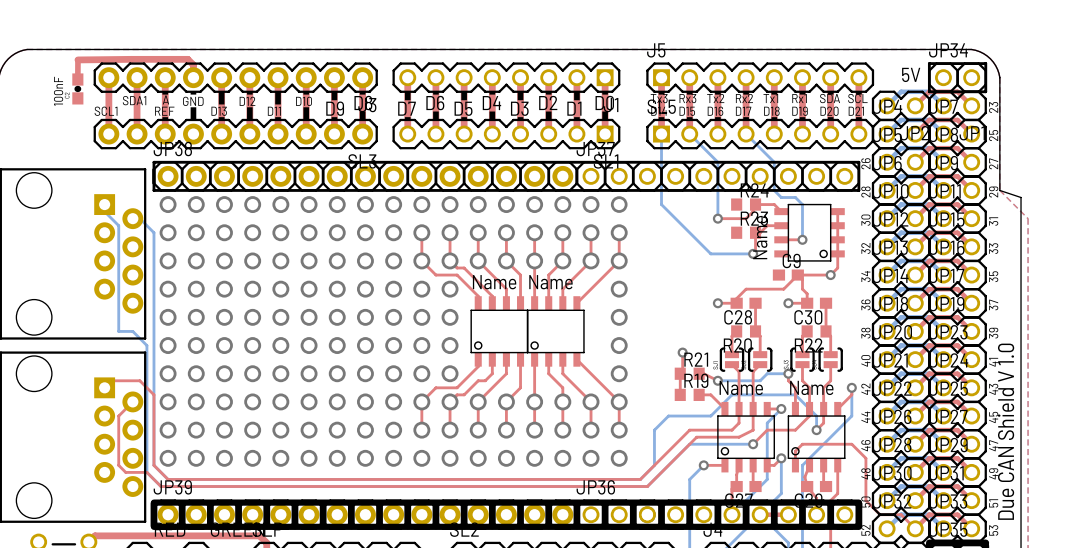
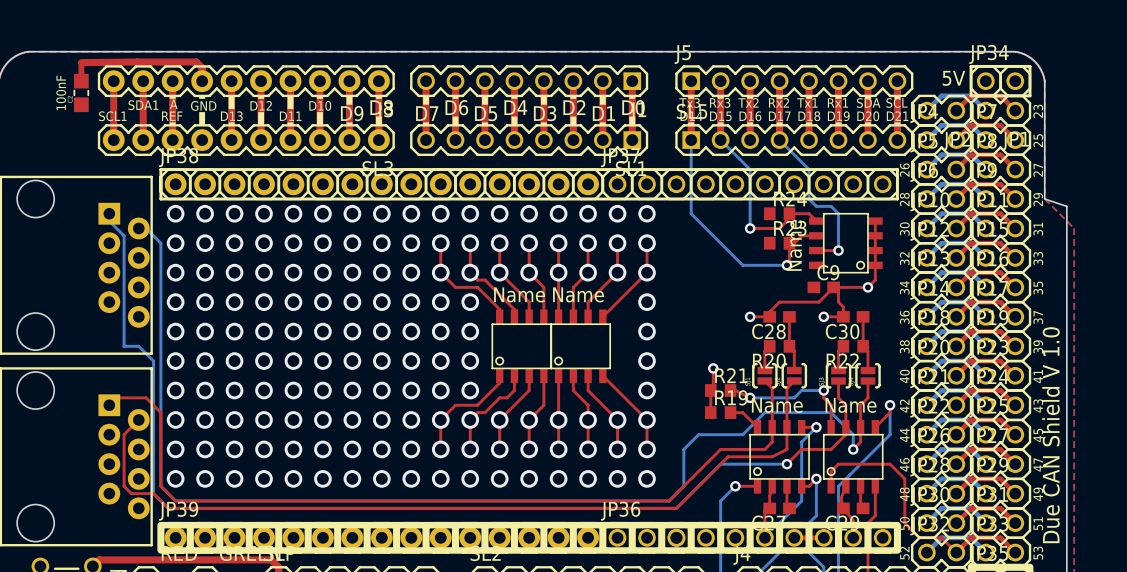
part footprint: [72, 73, 84, 105] -> [73, 73, 90, 113]

